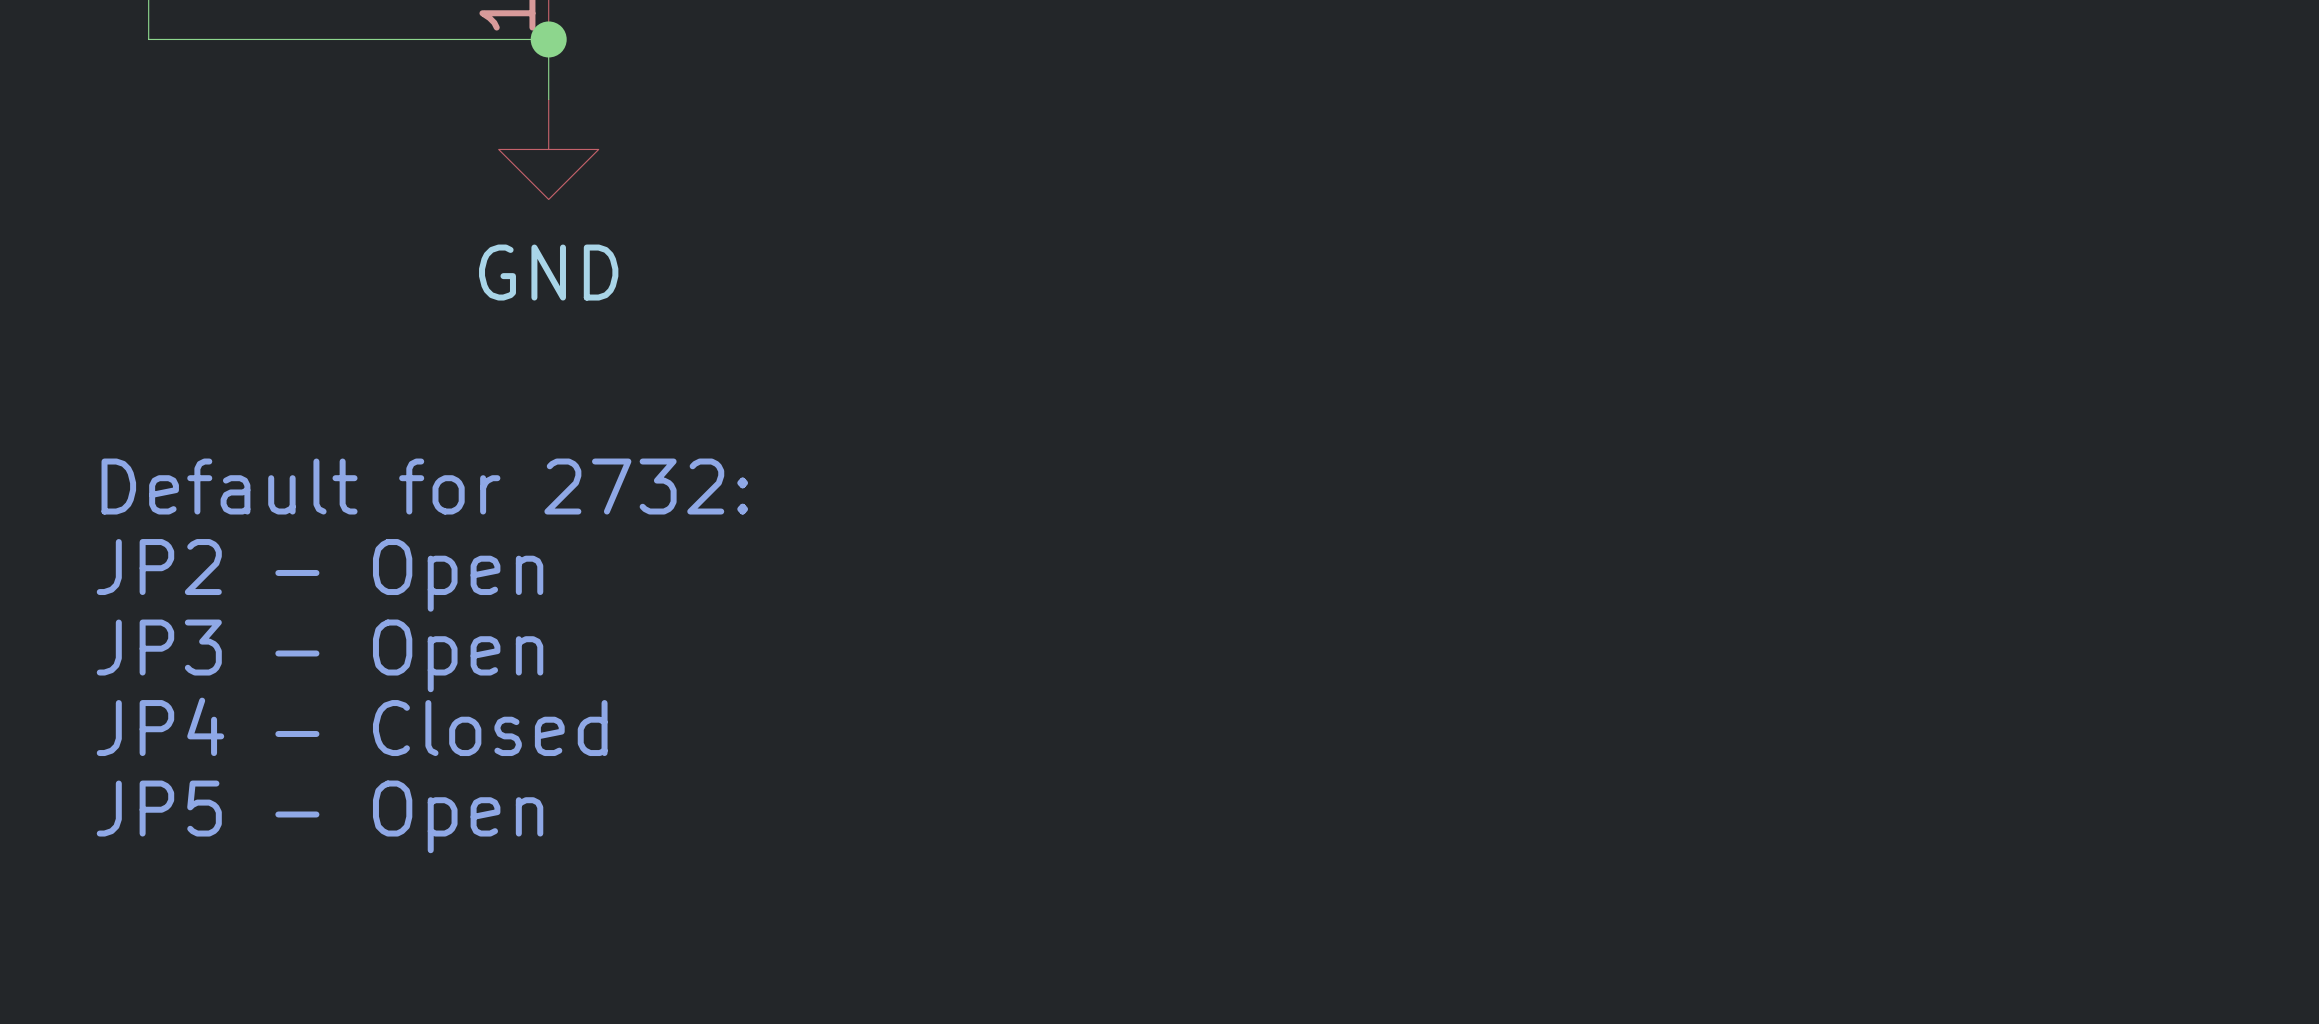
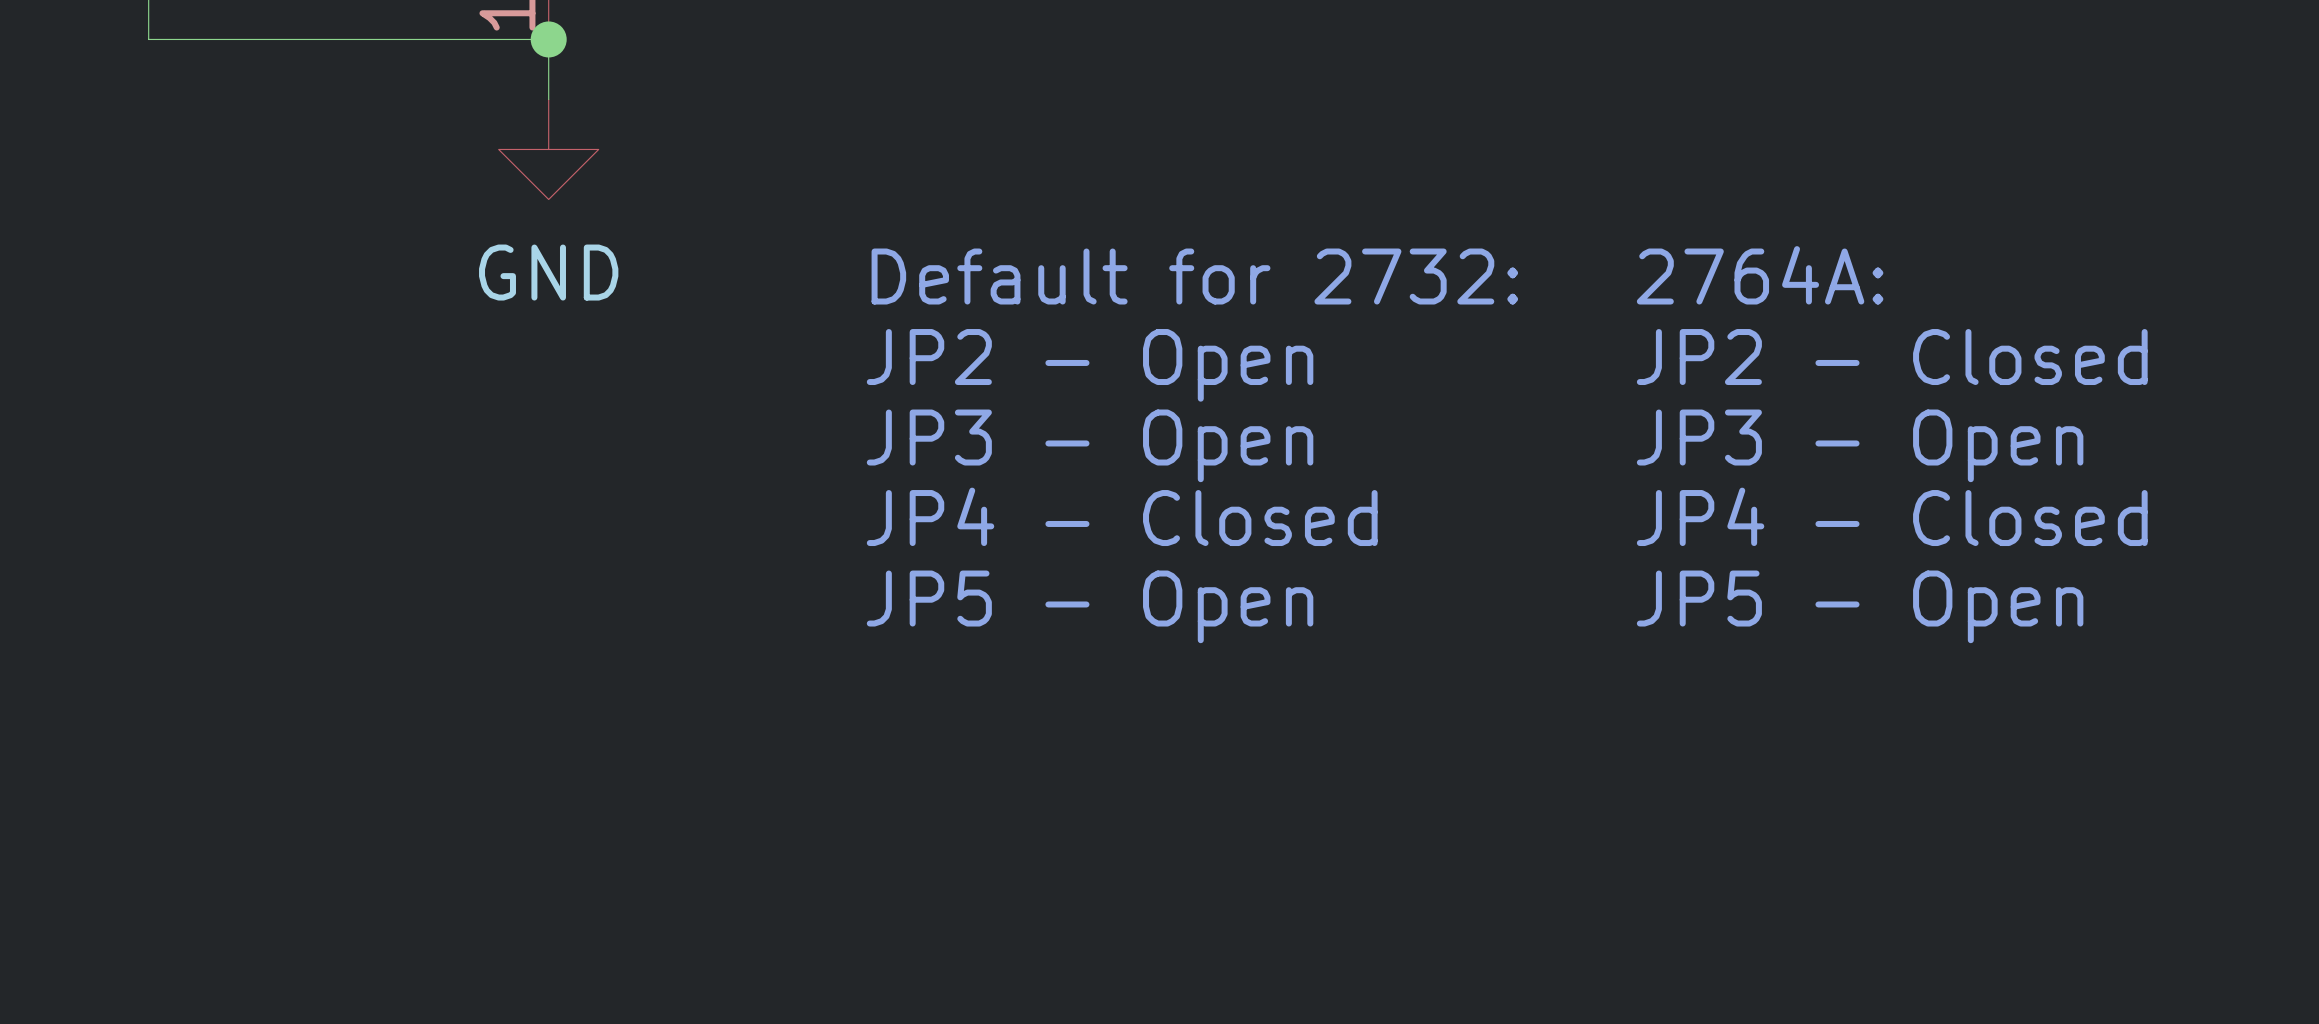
text: none -> 2764A: (1760, 275)
text: none -> JP2 - Closed (1892, 357)
text: none -> JP3 - Open (1090, 445)
text: none -> JP3 - Open (1860, 445)
text position: Default for 2732: (424, 486) -> Default for 2732: (1194, 276)
text: none -> JP4 - Closed (1122, 516)
text: none -> JP4 - Closed (1892, 516)
text position: JP2 - Open (320, 575) -> JP2 - Open (1090, 365)
text: none -> JP5 - Open (1090, 606)
text: none -> JP5 - Open (1860, 606)
text: JP3 - Open (320, 655) -> none
text: JP4 - Closed (352, 726) -> none
text: JP5 - Open (320, 816) -> none

